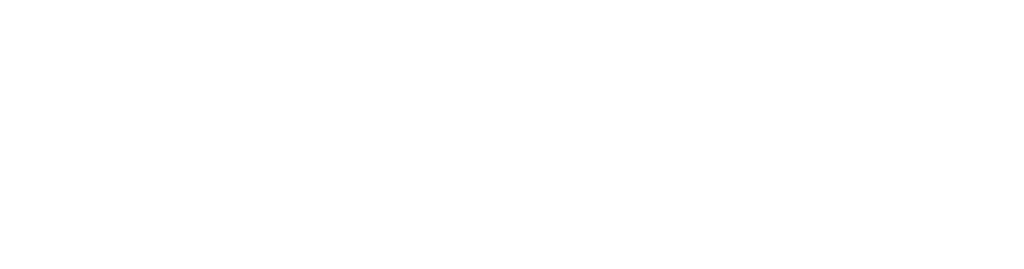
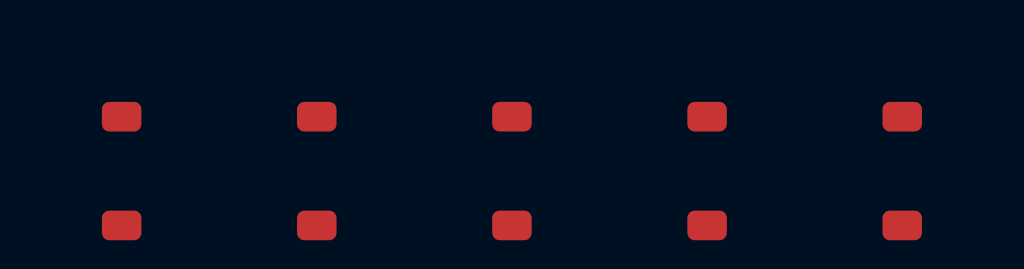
part: none -> (121, 171)
part: none -> (316, 171)
part: none -> (511, 171)
part: none -> (707, 171)
part: none -> (902, 171)

